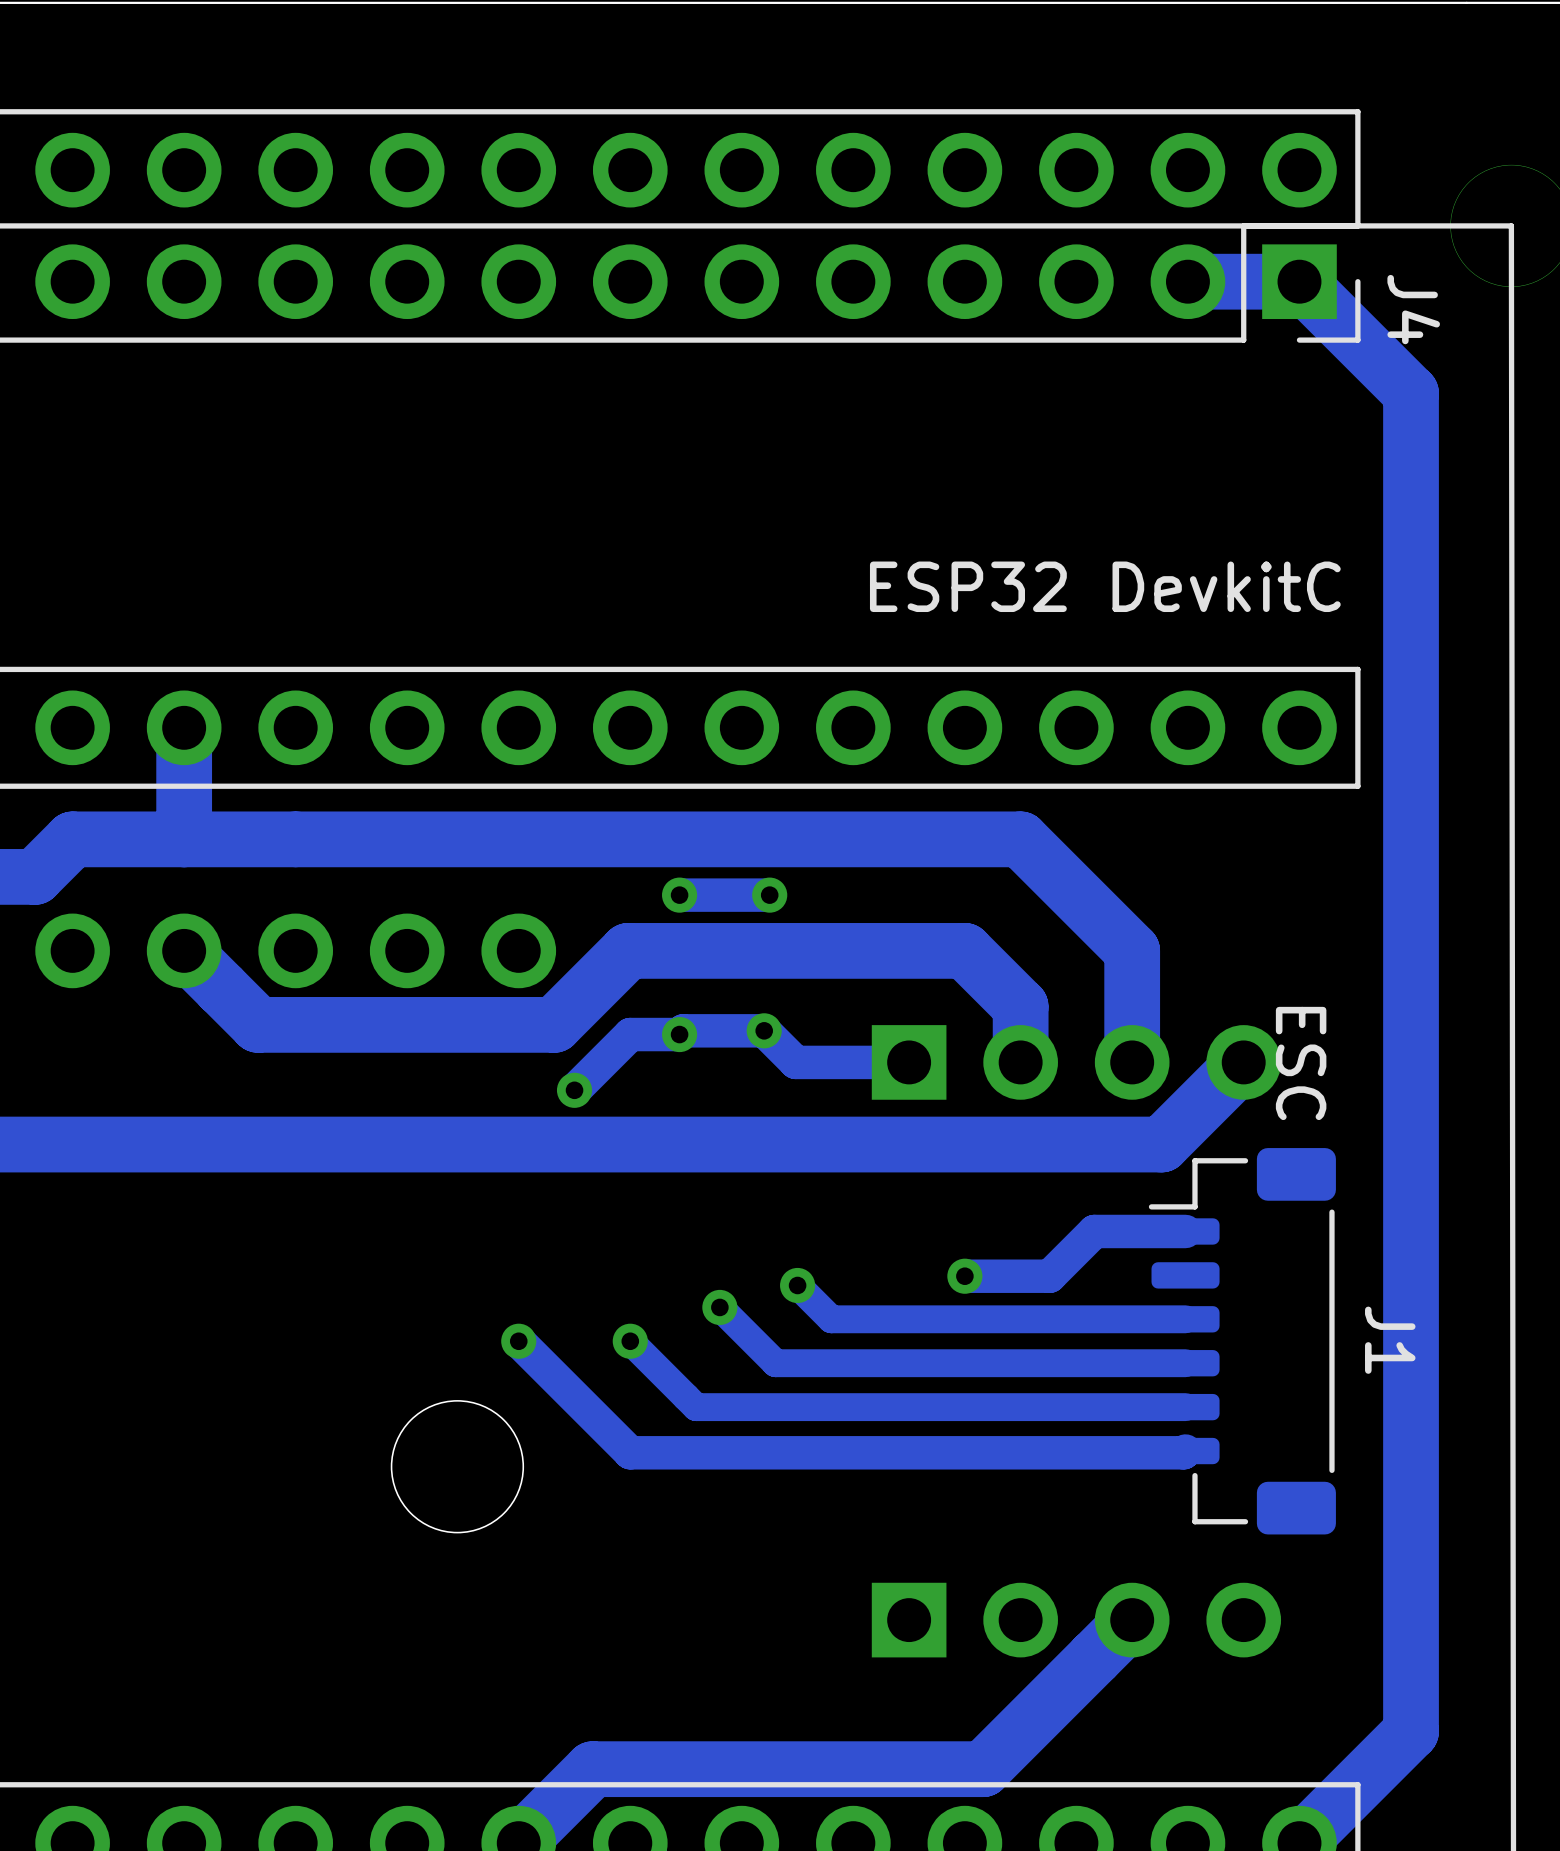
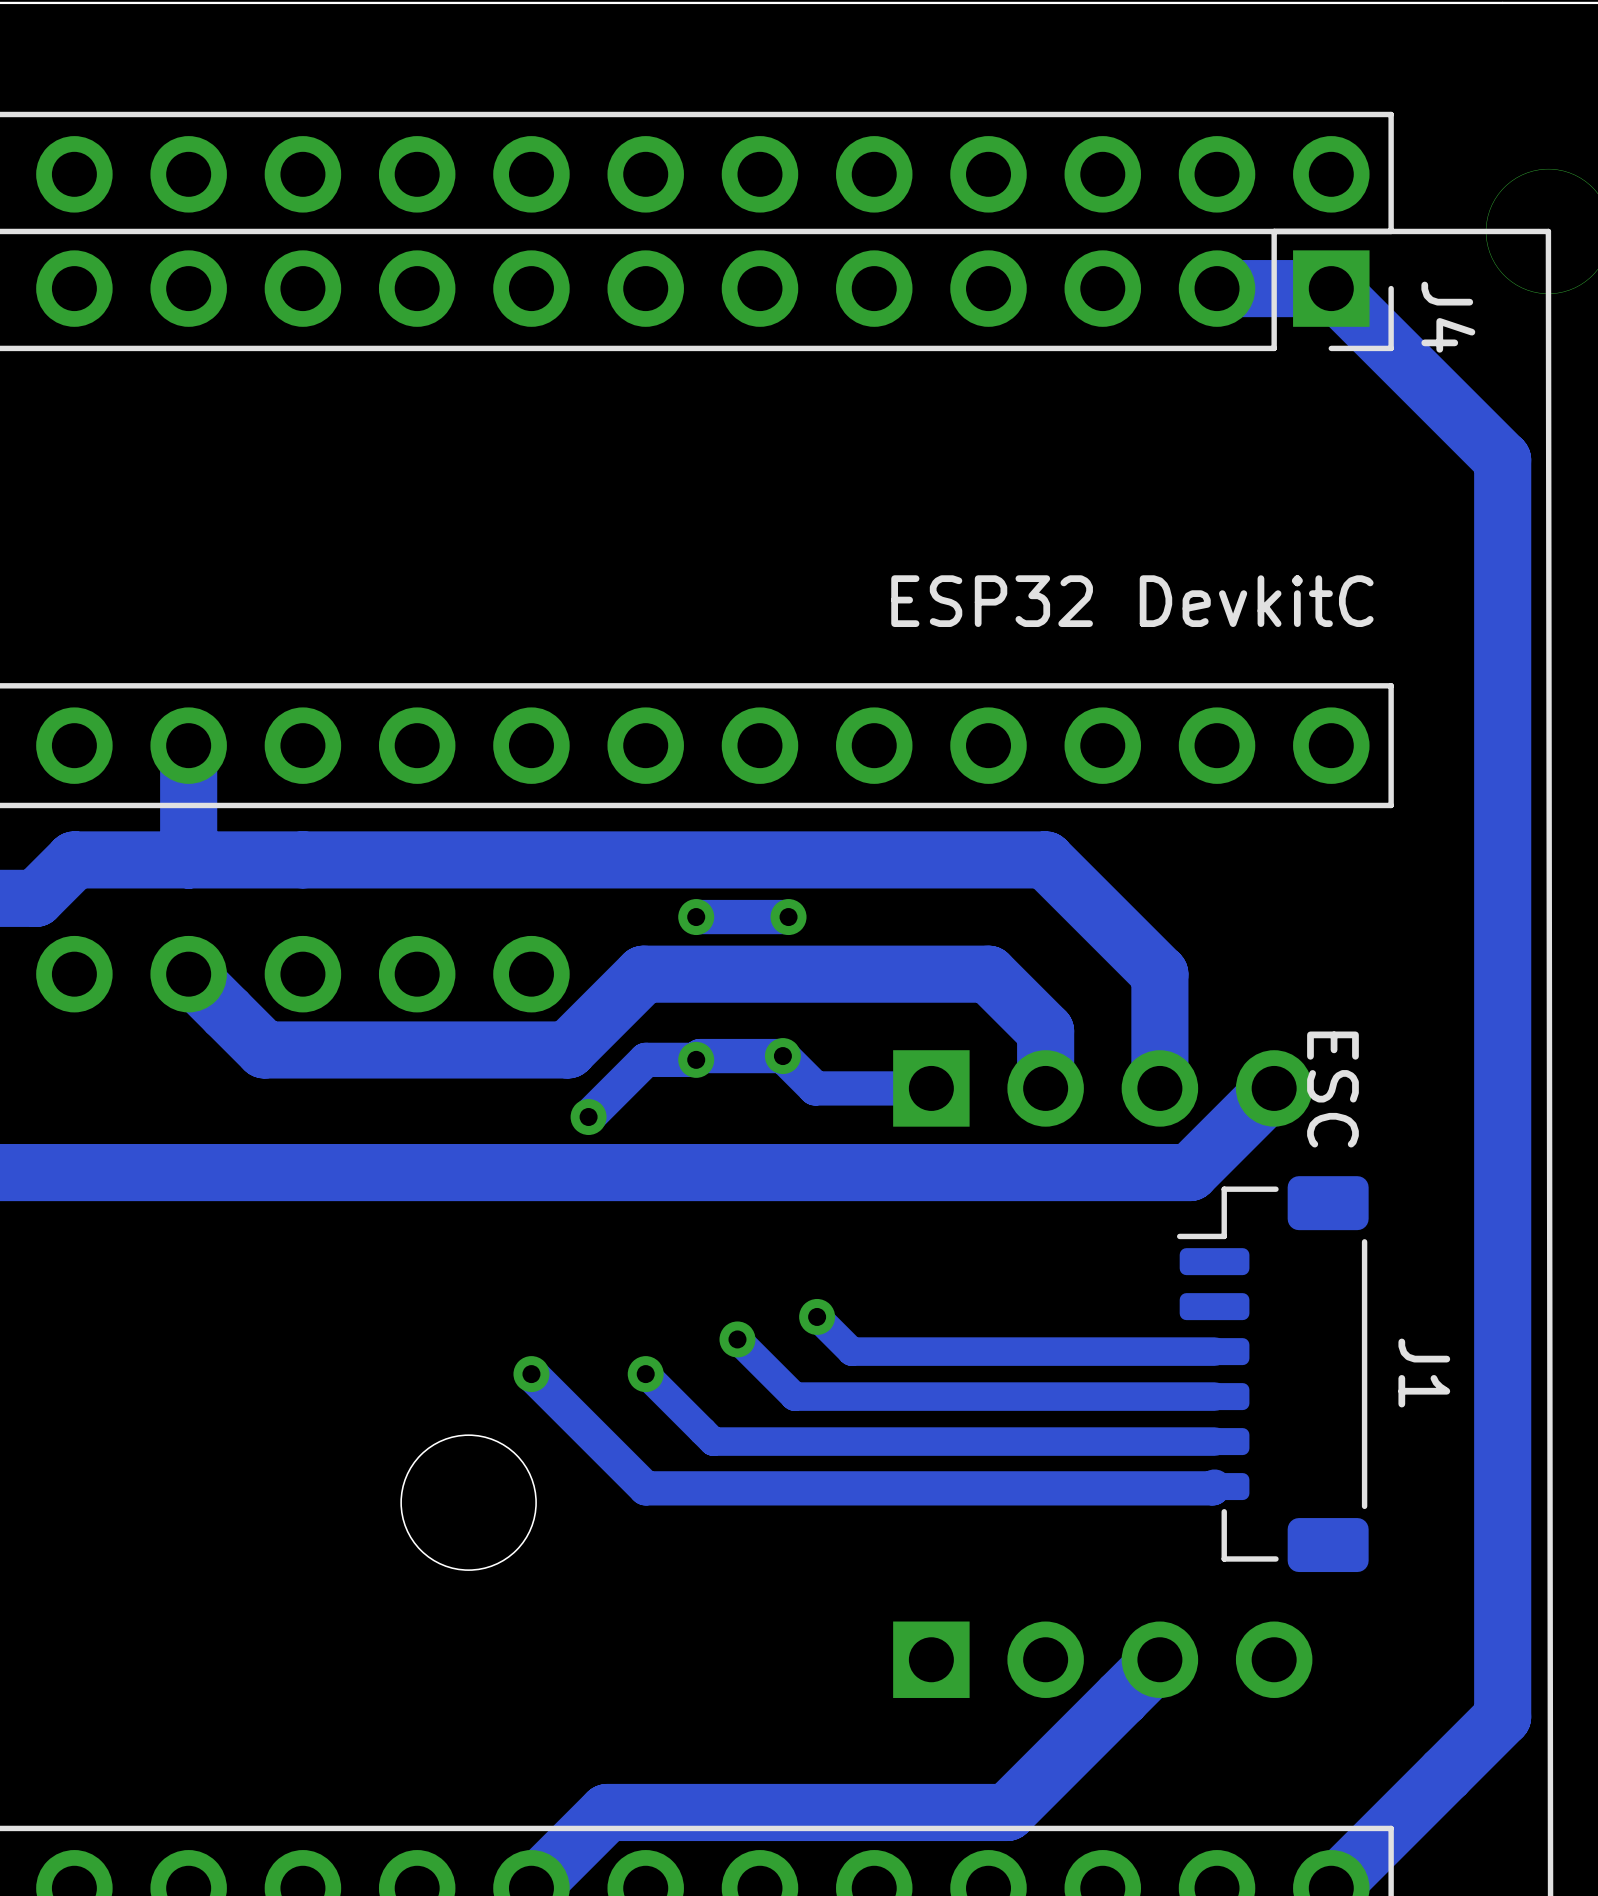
track: (1411, 393) (1411, 1731) -> (1445, 402) (1502, 459) (1502, 1716) (1445, 1774)
track: (1185, 1231) (1094, 1231) (1049, 1276) (964, 1276) -> none
via: (964, 1276) -> none

